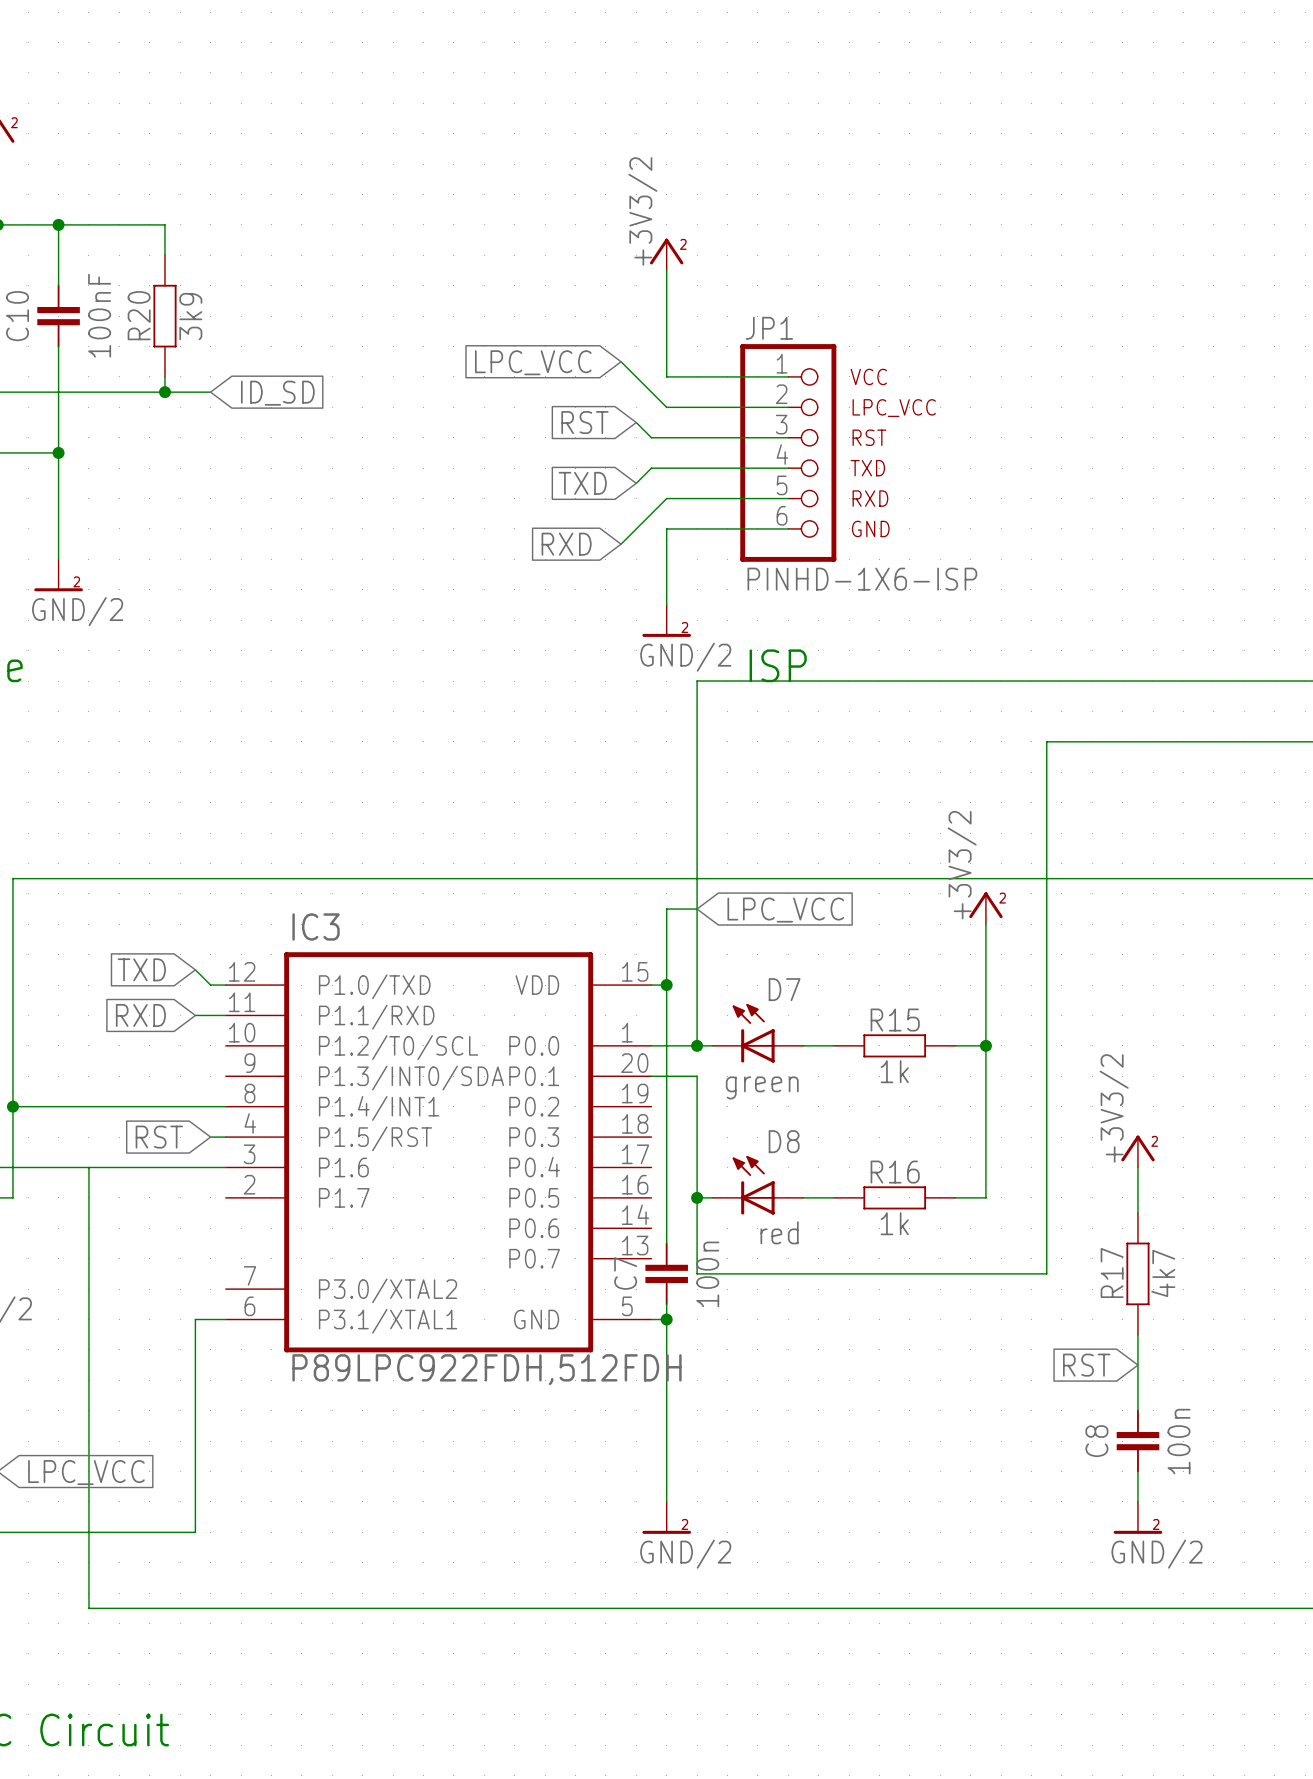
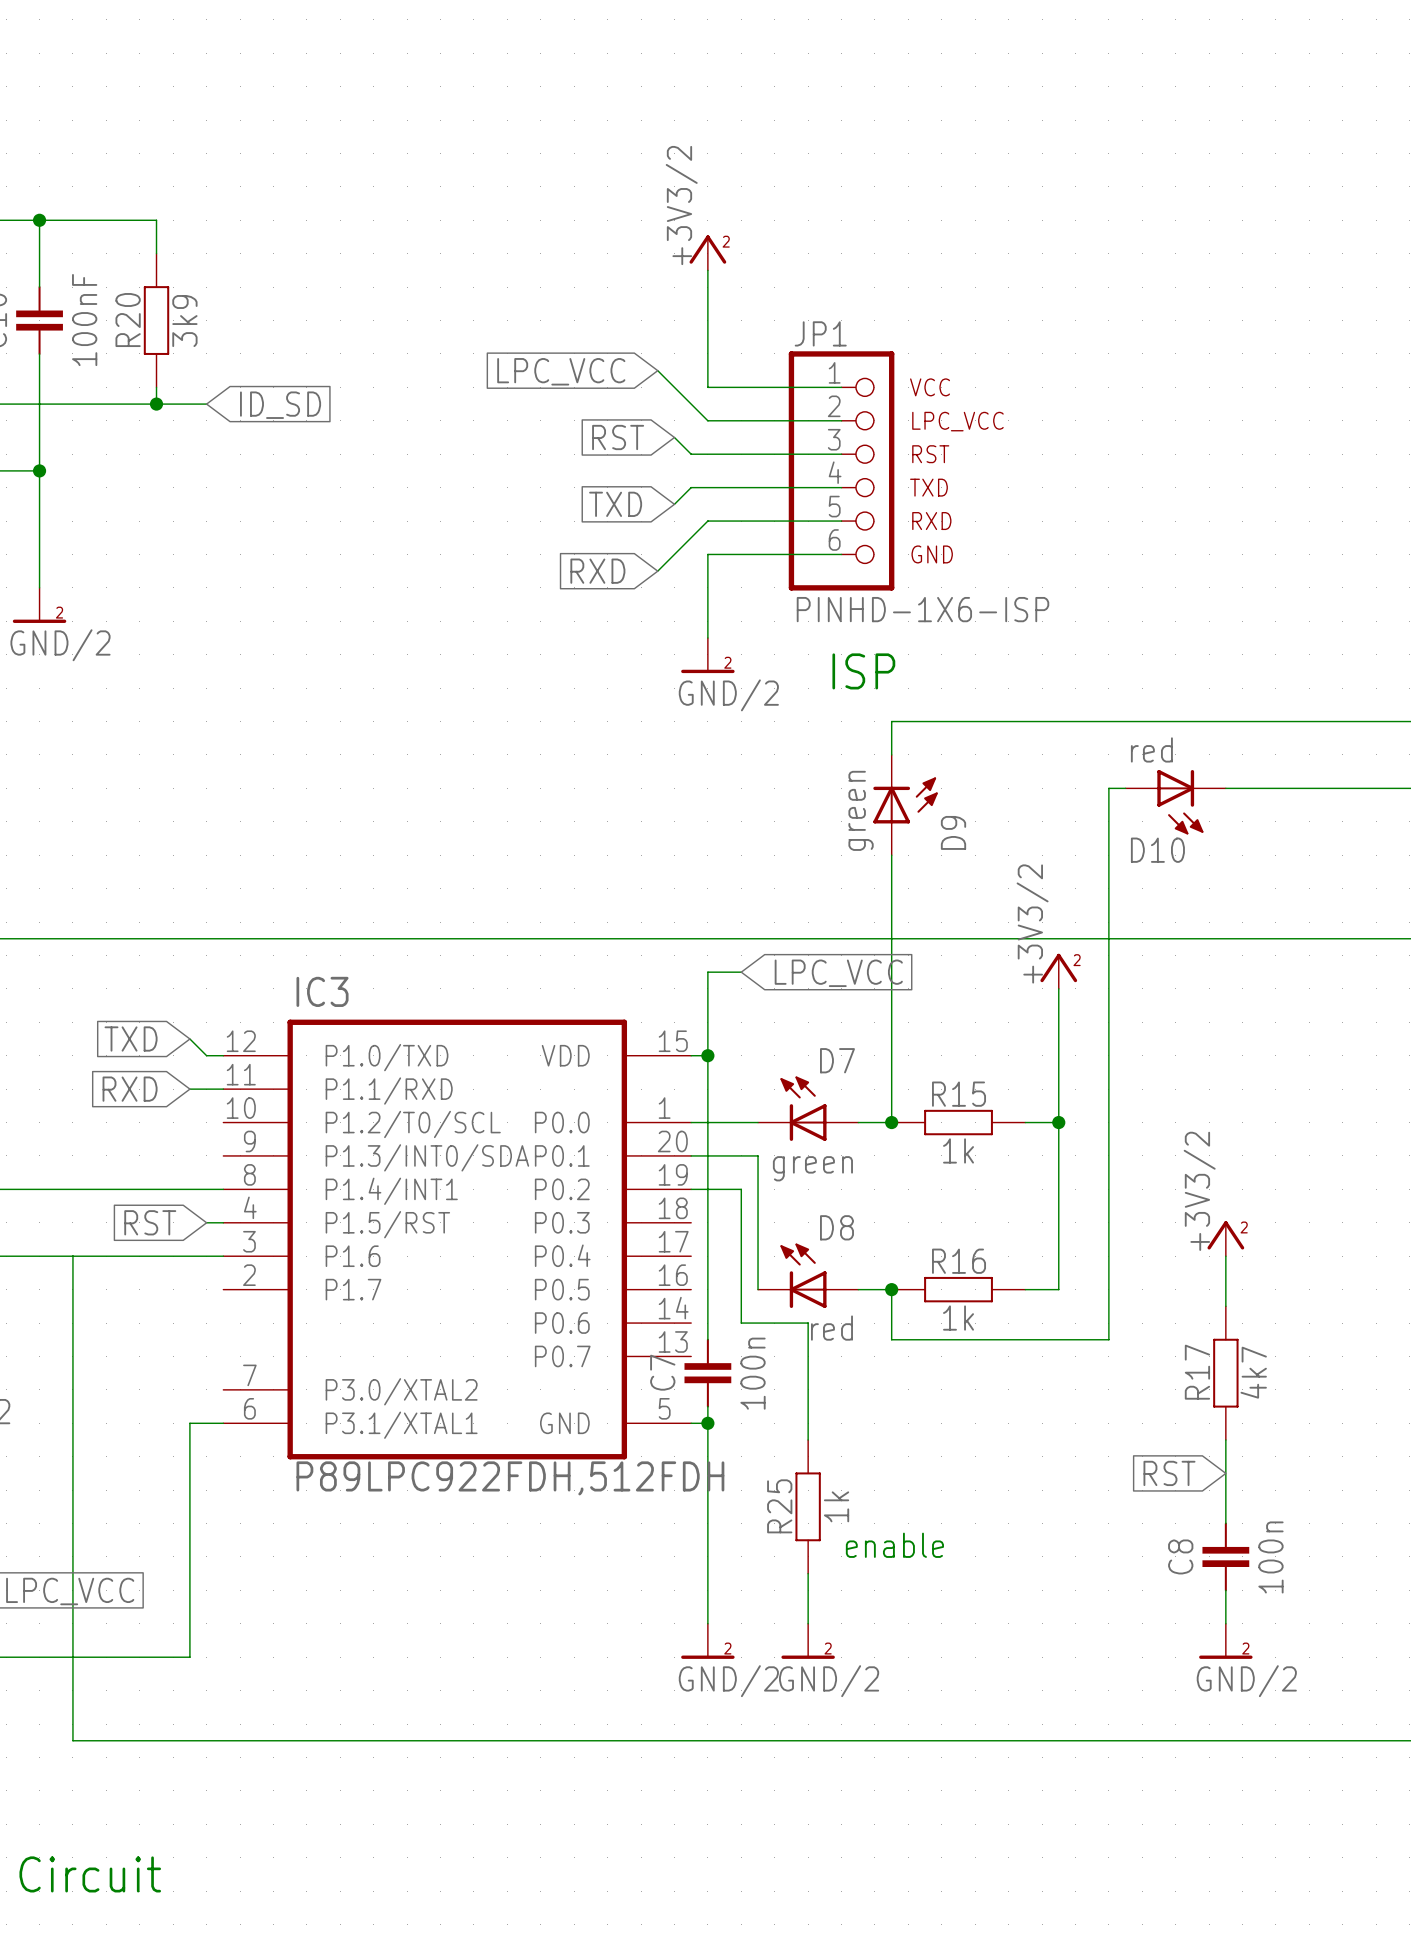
text position: ISP (778, 665) -> ISP (863, 671)
wire: (833, 681) (697, 681) (697, 1045) -> (891, 721) (891, 754)
wire: none -> (1125, 788) (1108, 788) (1108, 1339) (891, 1339) (891, 1289)
wire: (1137, 741) (1046, 741) (1046, 1273) (697, 1273) (697, 1228) -> (808, 1440) (808, 1323) (741, 1323)
D10: none -> red (1175, 802)
D9: none -> green (905, 805)
wire: none -> (891, 855) (891, 1122)
junction: (697, 1045) -> none
junction: none -> (891, 1122)
wire: (697, 1076) (697, 1106) -> (691, 1189) (741, 1189)
wire: (697, 1197) (712, 1197) -> (741, 1155) (758, 1155) (758, 1289)
junction: (697, 1197) -> none
junction: none -> (891, 1289)
R25: none -> 1k (808, 1506)
text: none -> enable (894, 1545)
wire: none -> (808, 1573) (808, 1623)
power symbol: none -> GND/2 (808, 1641)

